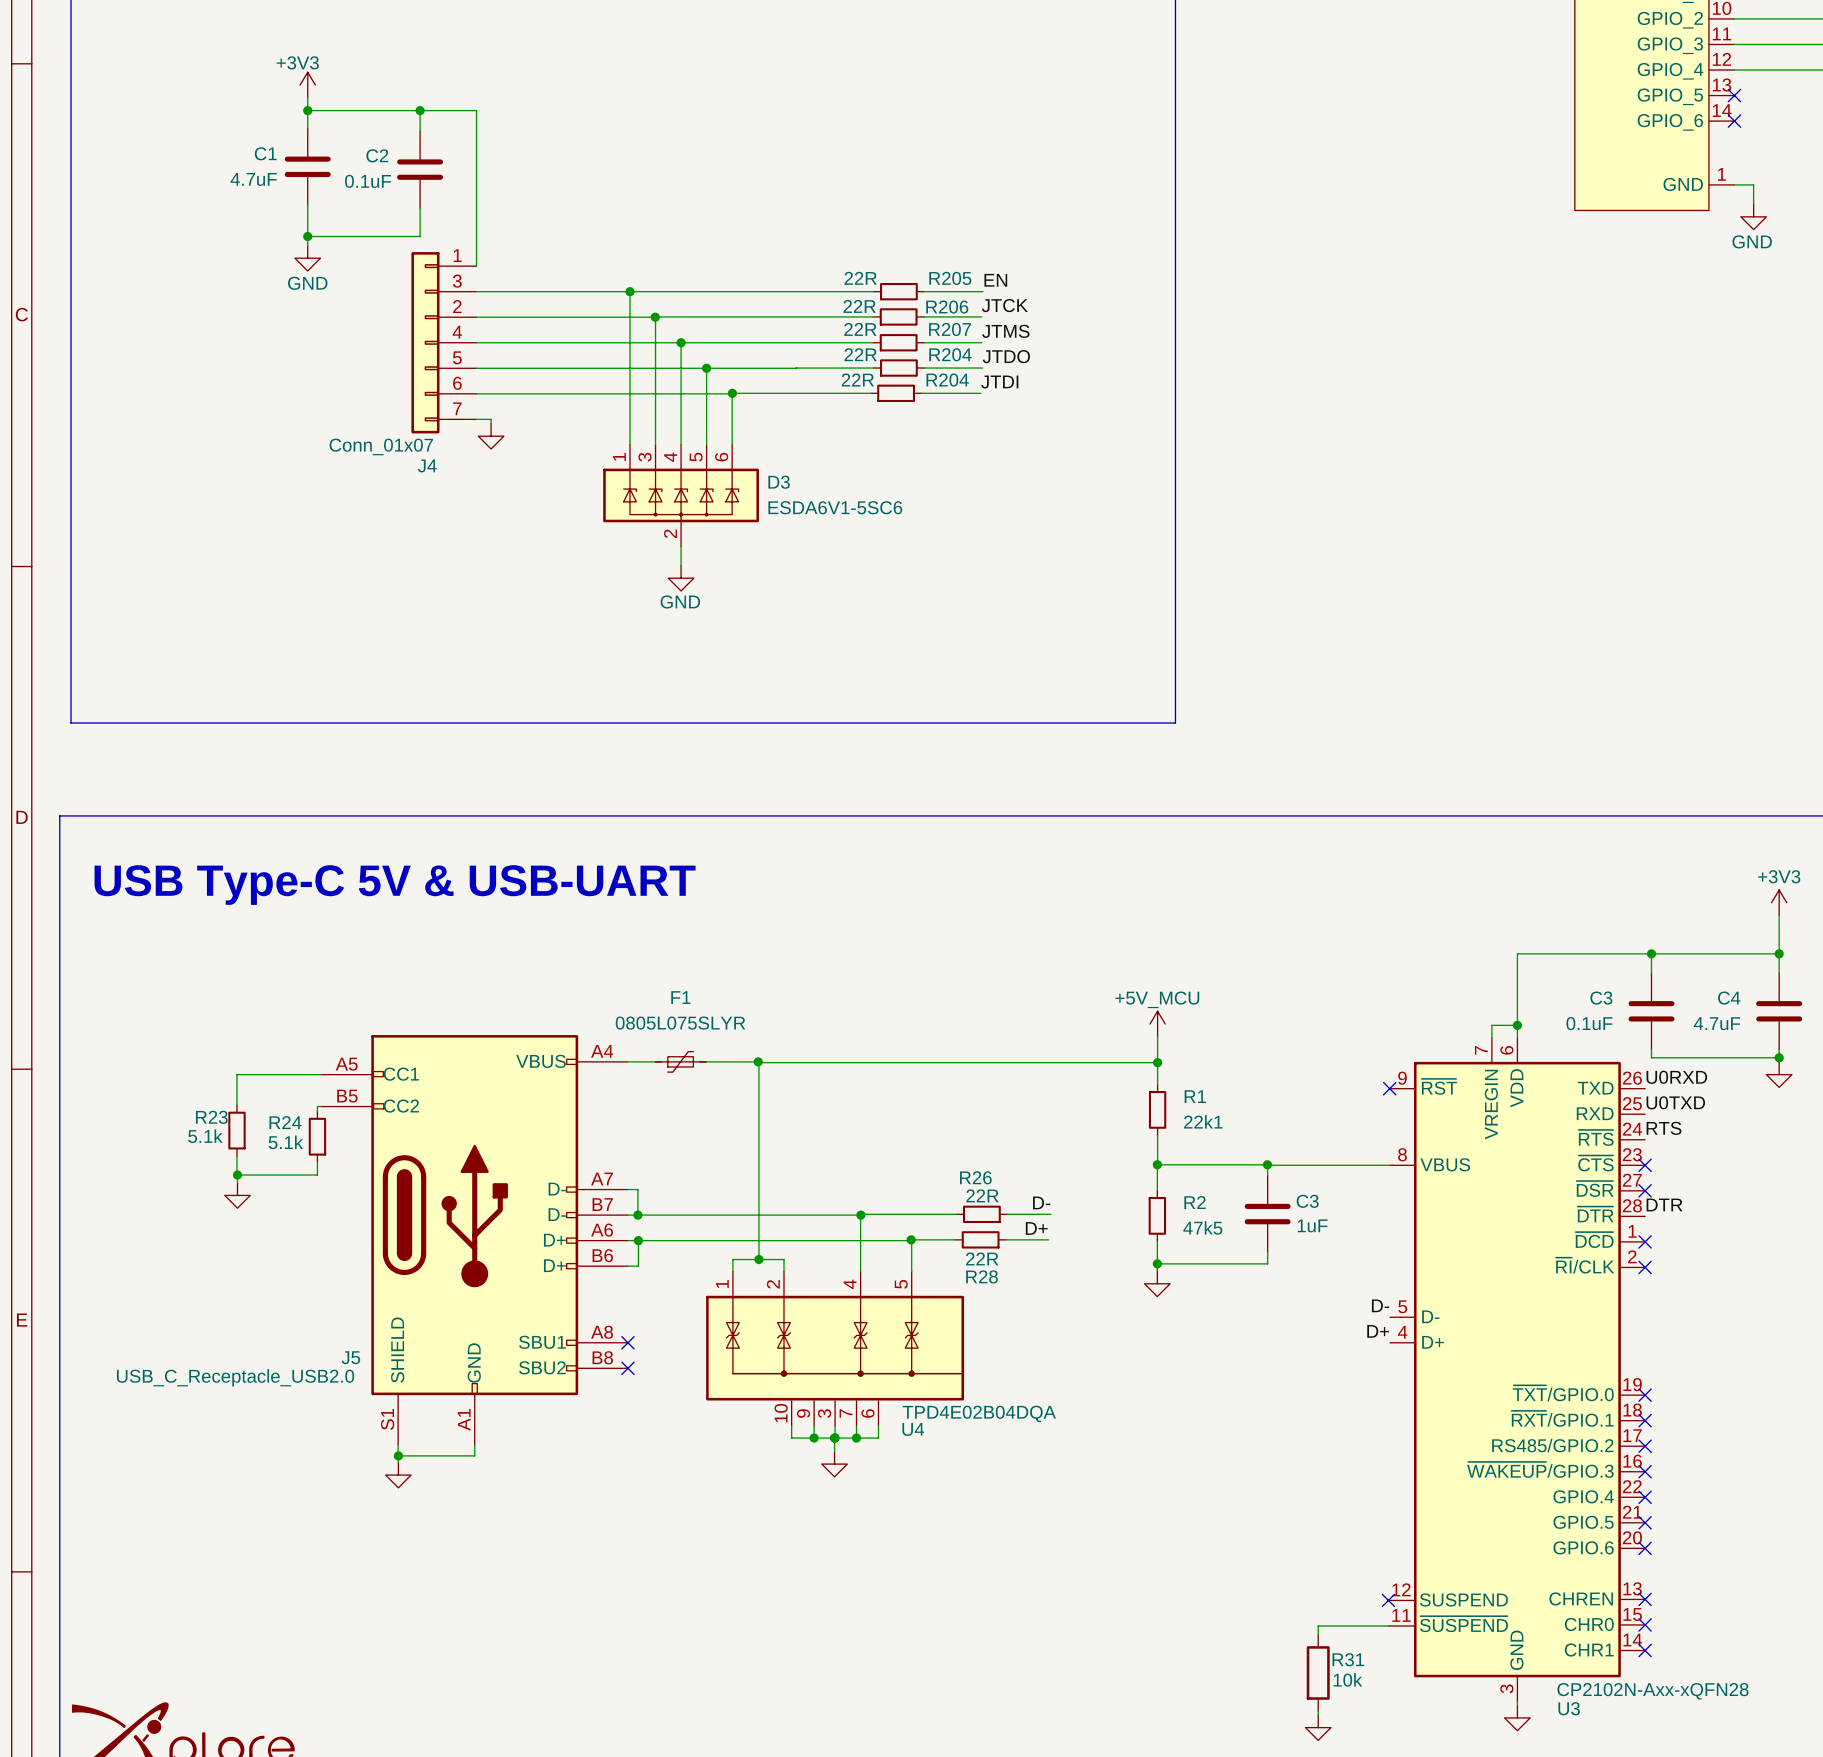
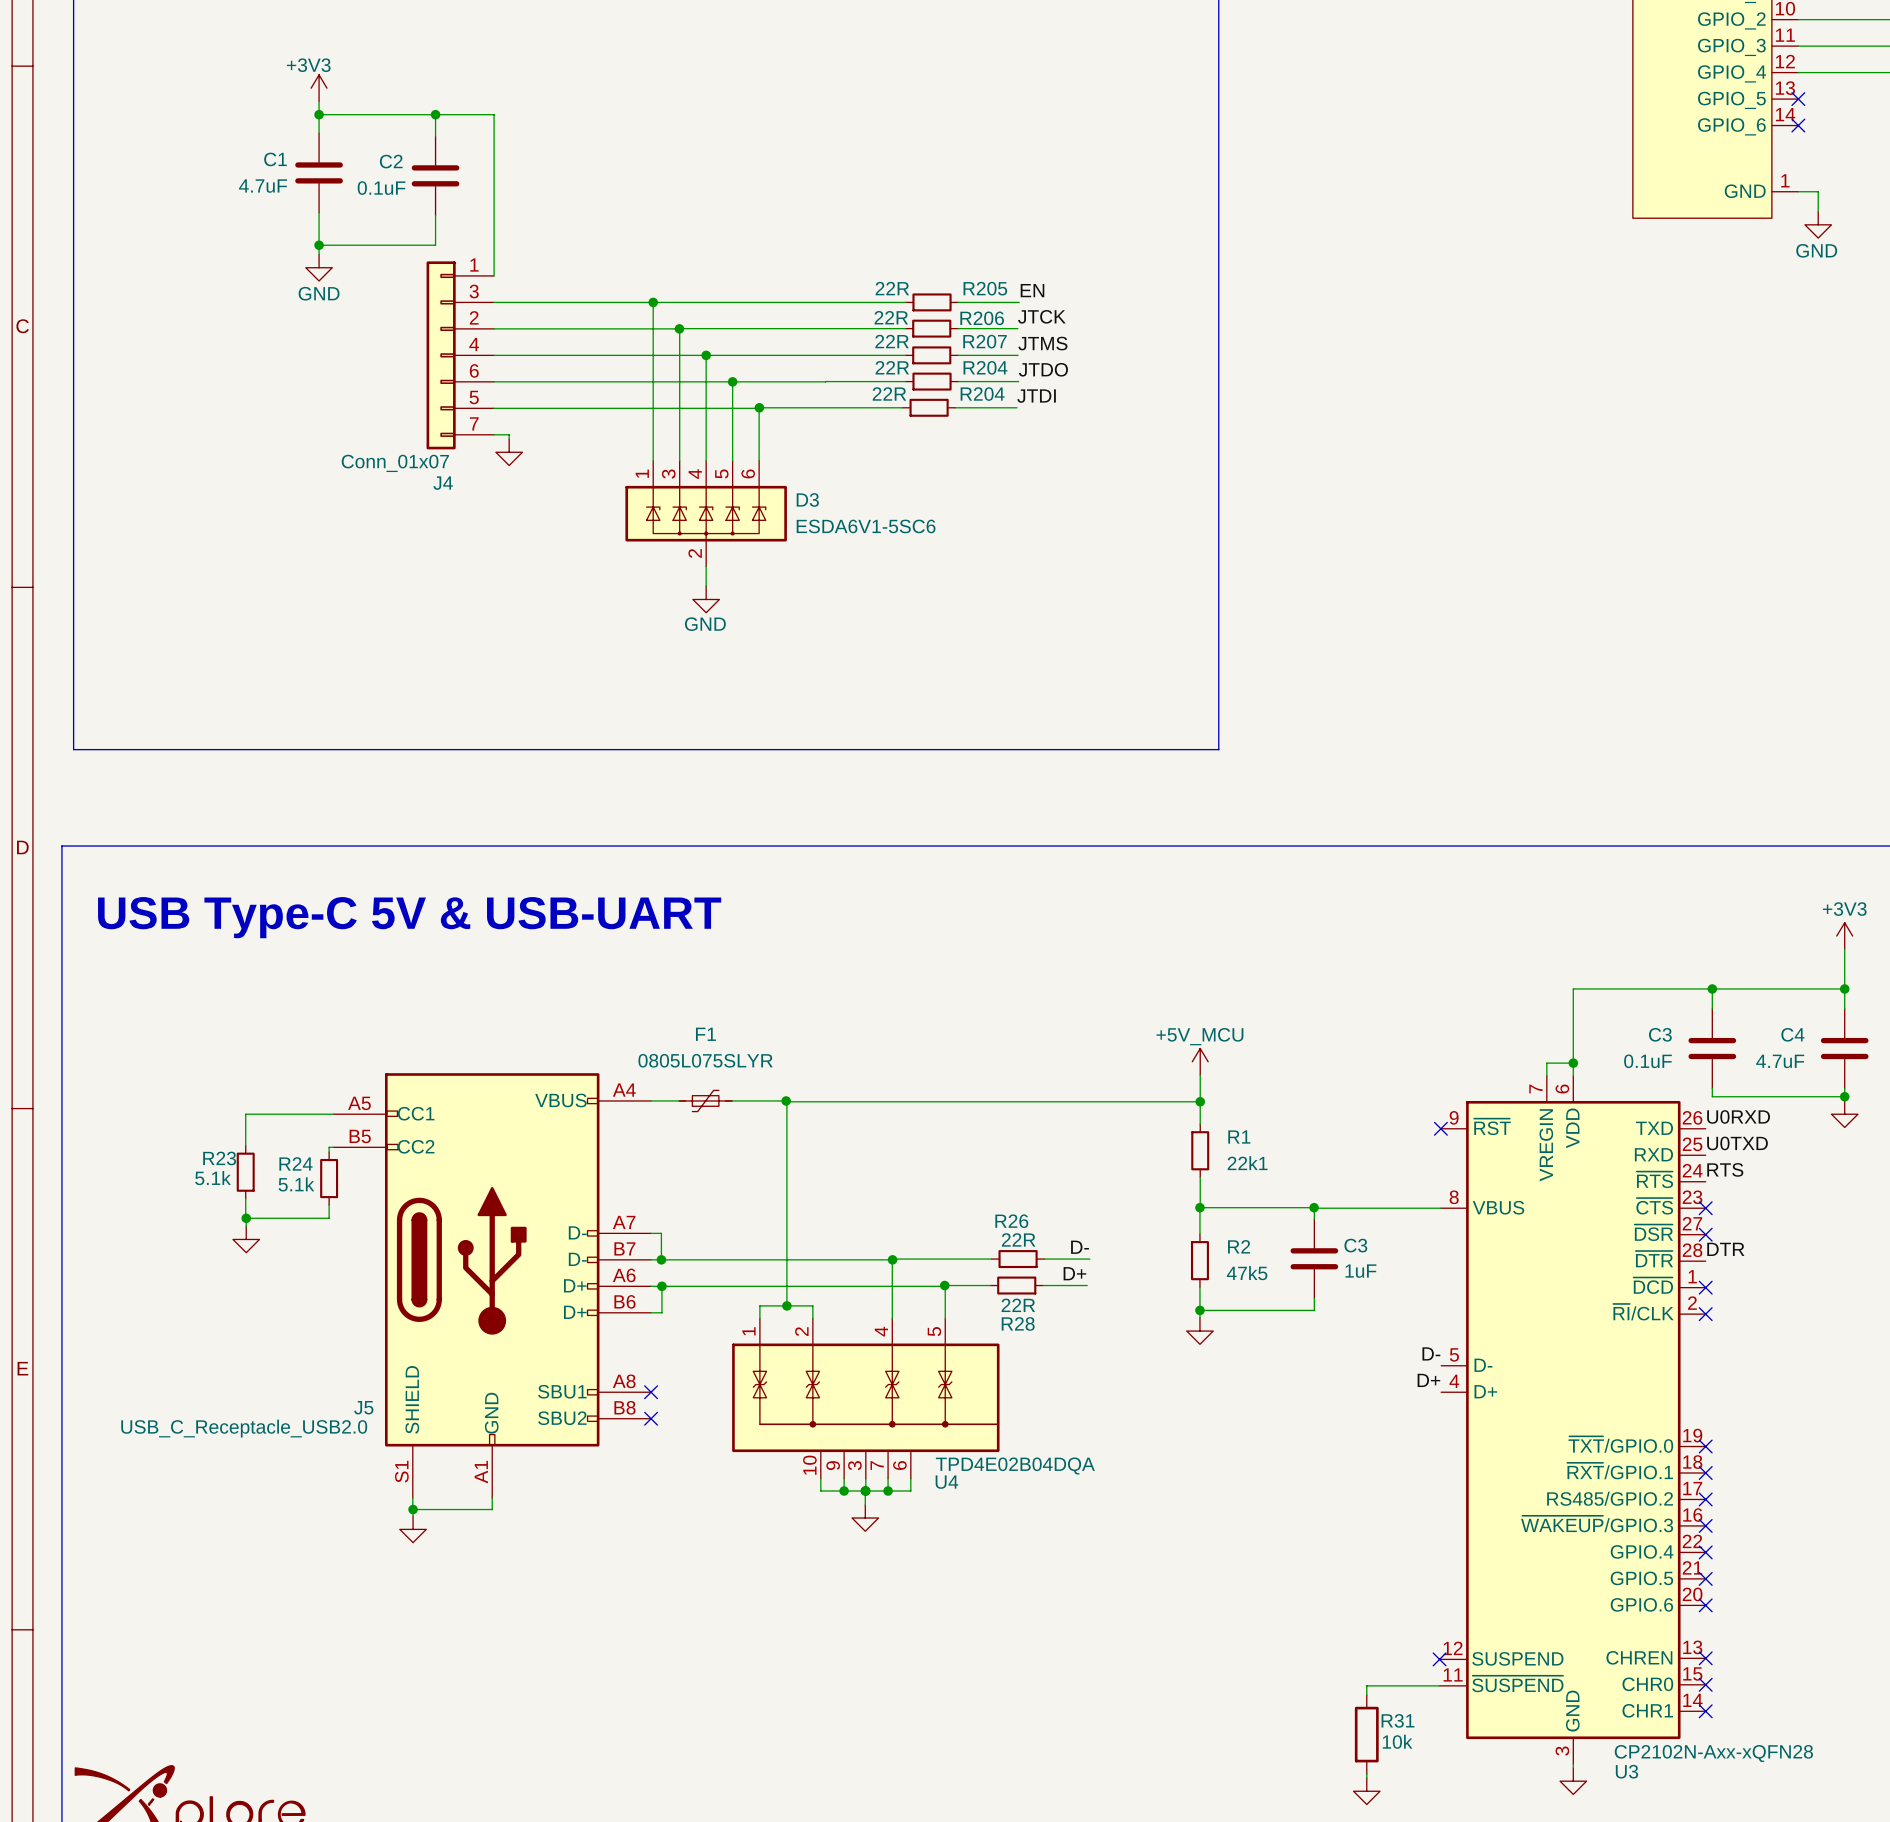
J4 pin number: 5 (457, 357) -> 6 (474, 370)
J4 pin number: 6 (457, 383) -> 5 (474, 397)

